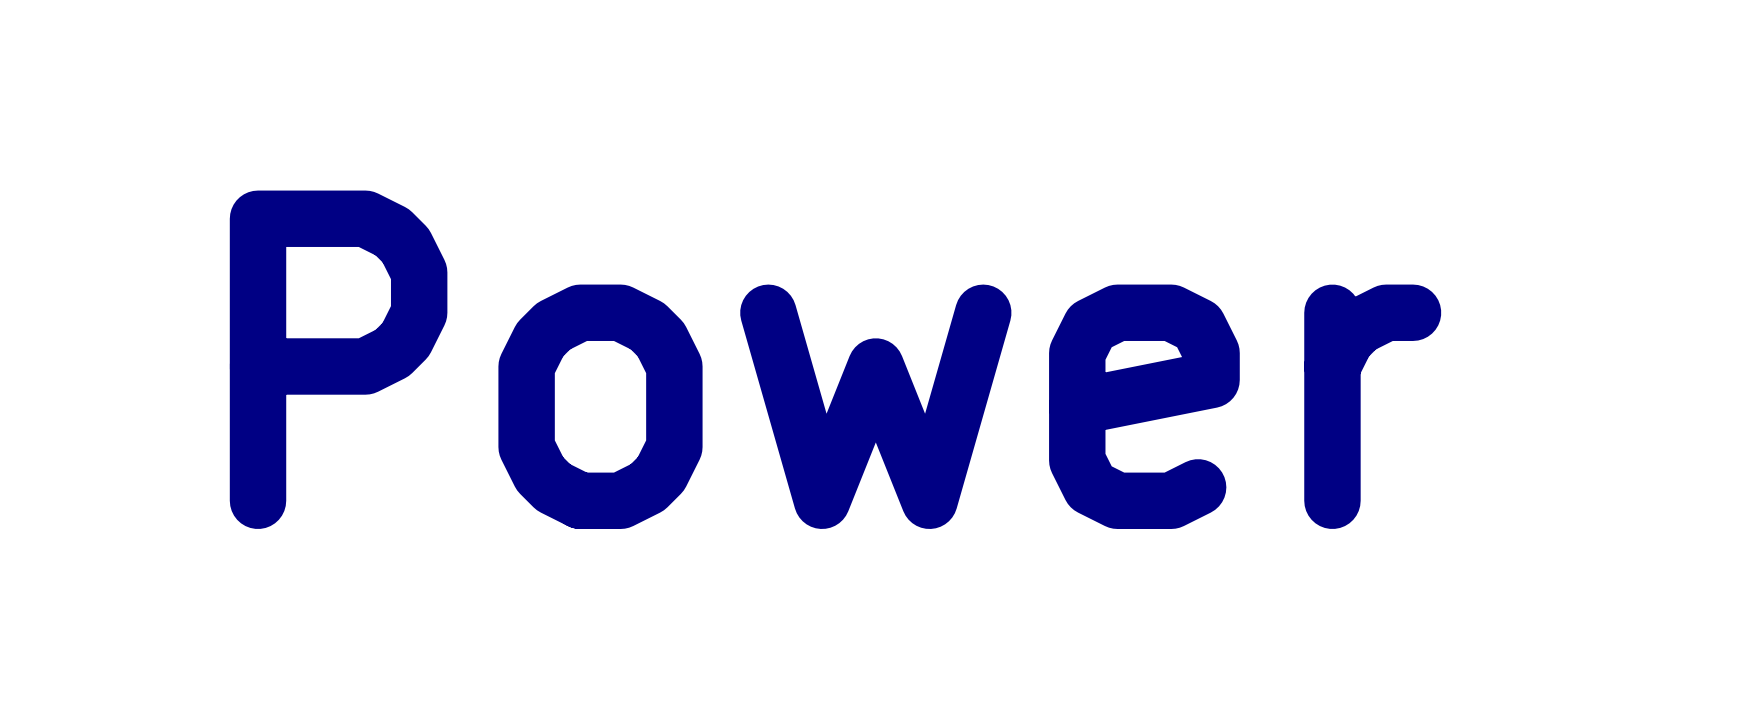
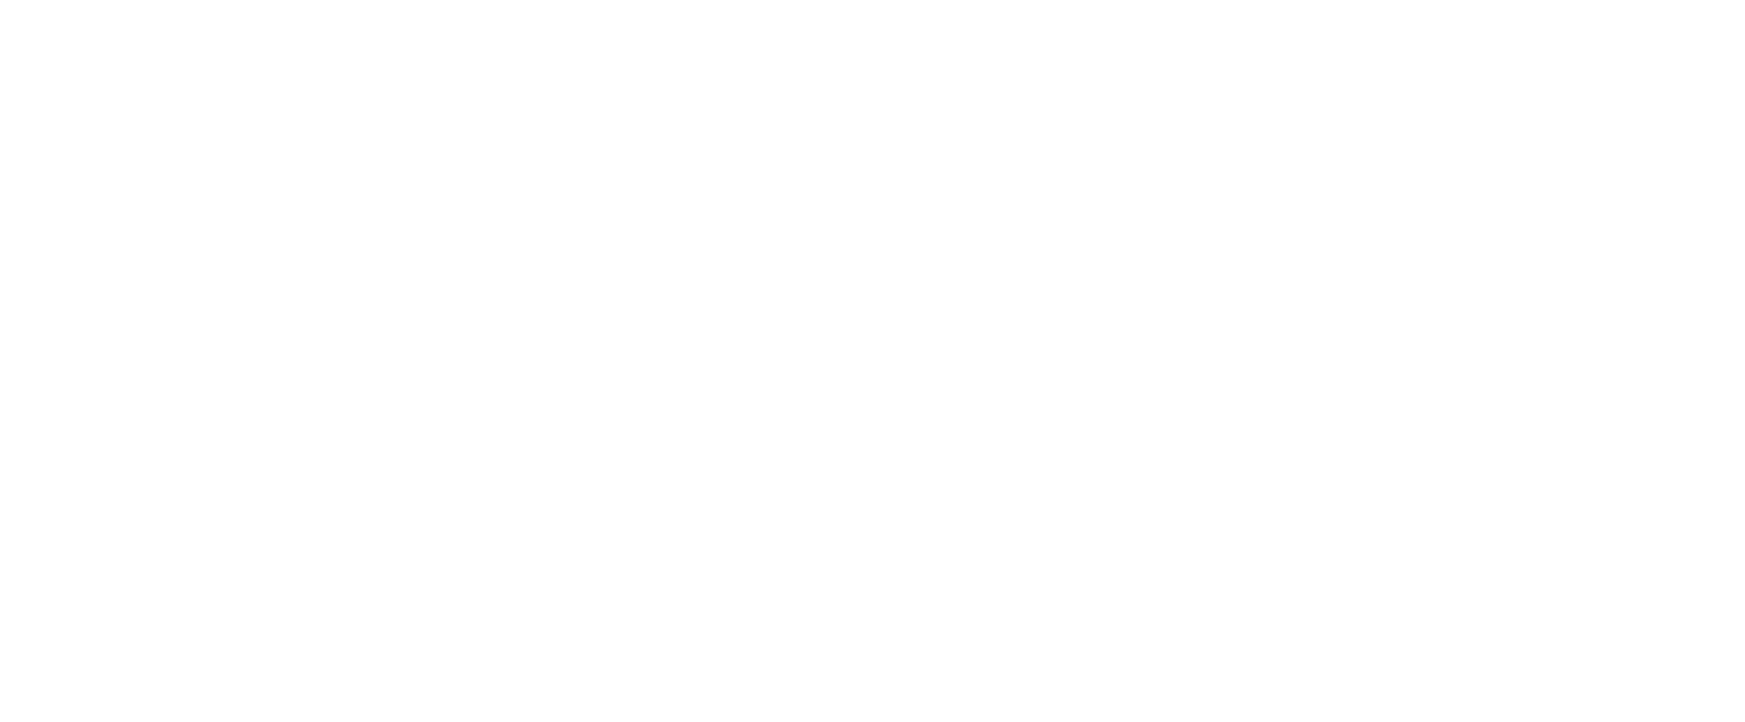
text: Power (835, 359) -> none

